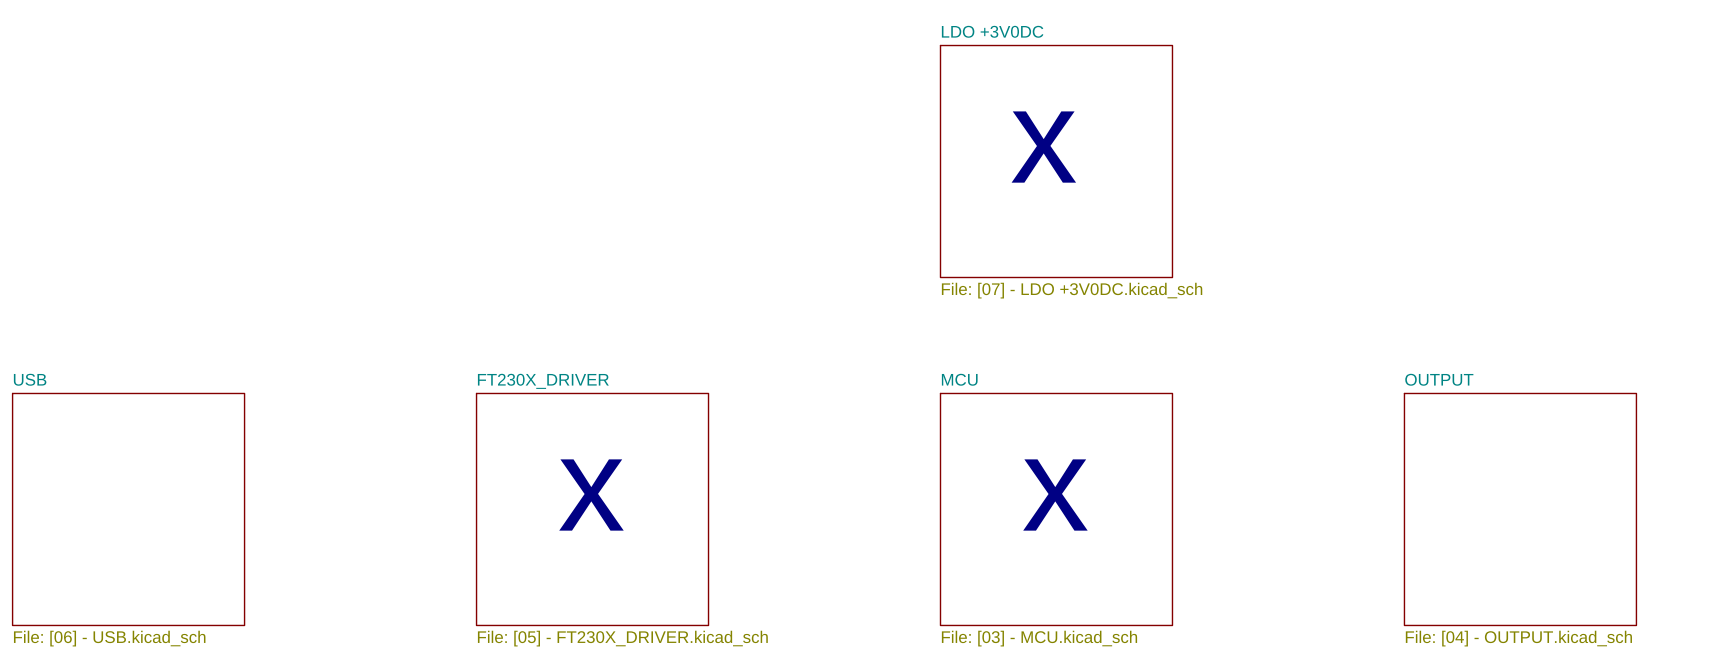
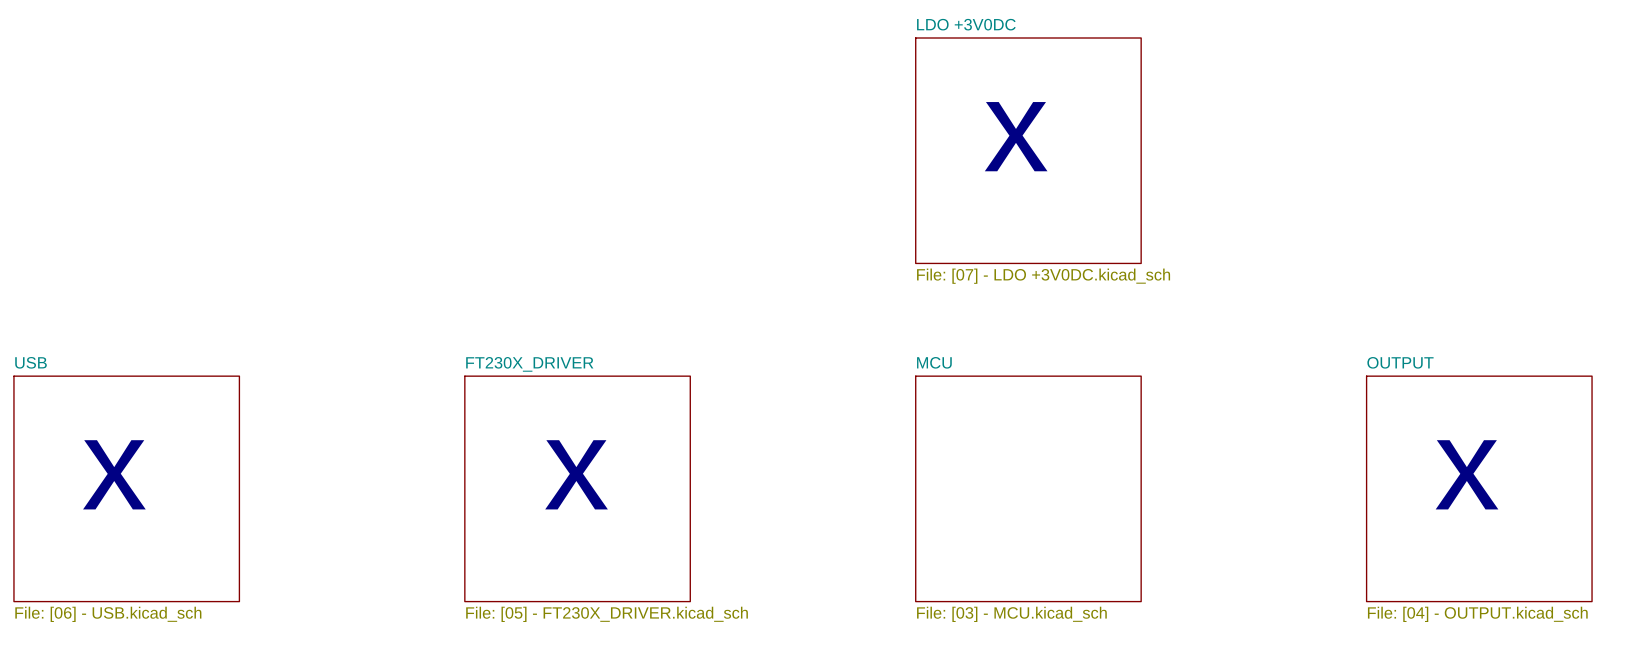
text: none -> x (114, 474)
text: x (1055, 495) -> none
text: none -> x (1467, 474)

